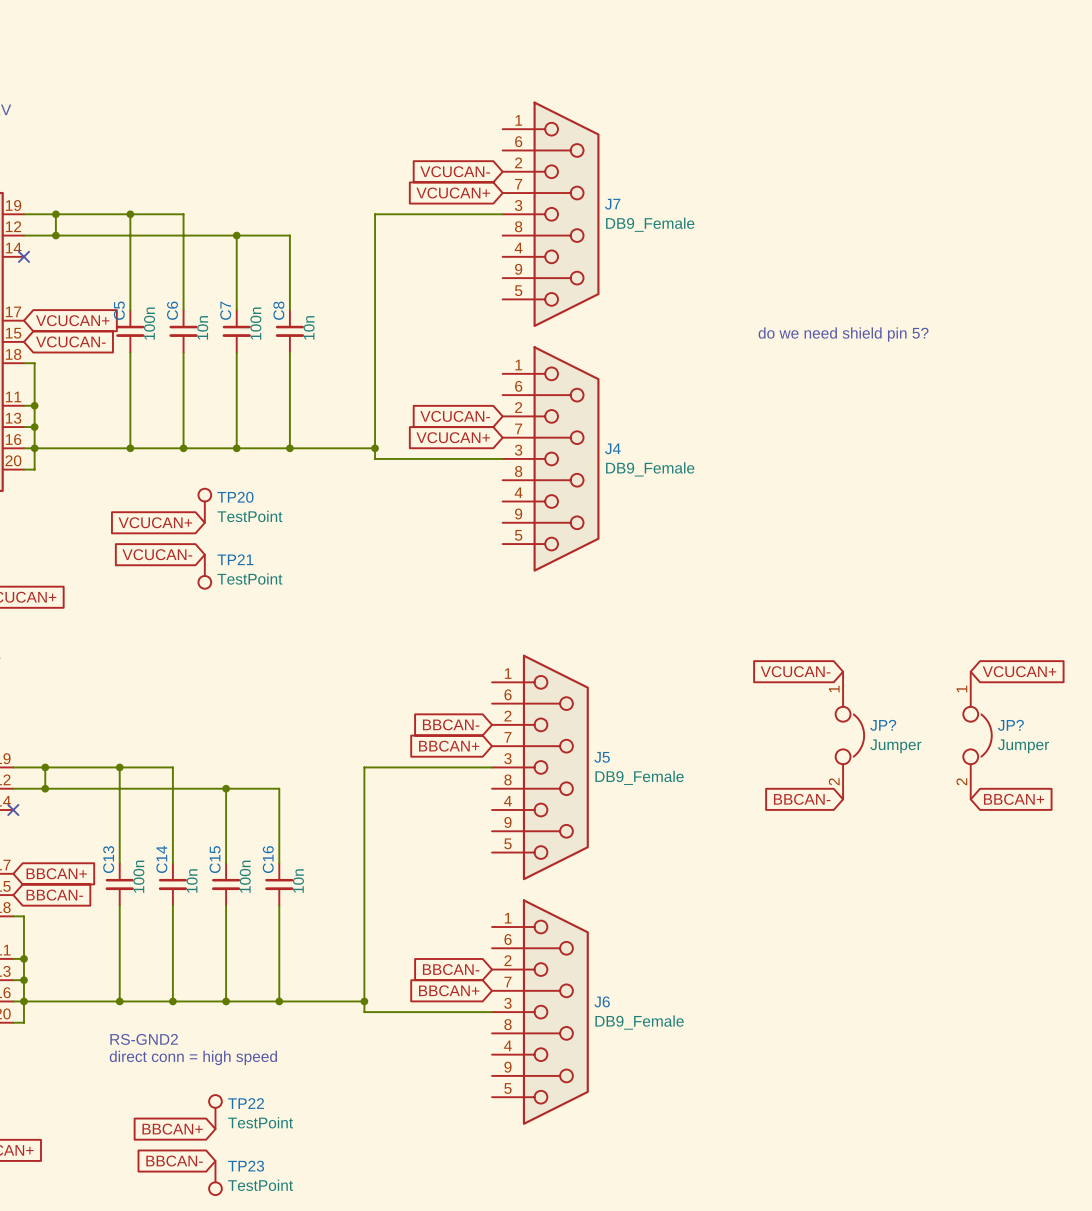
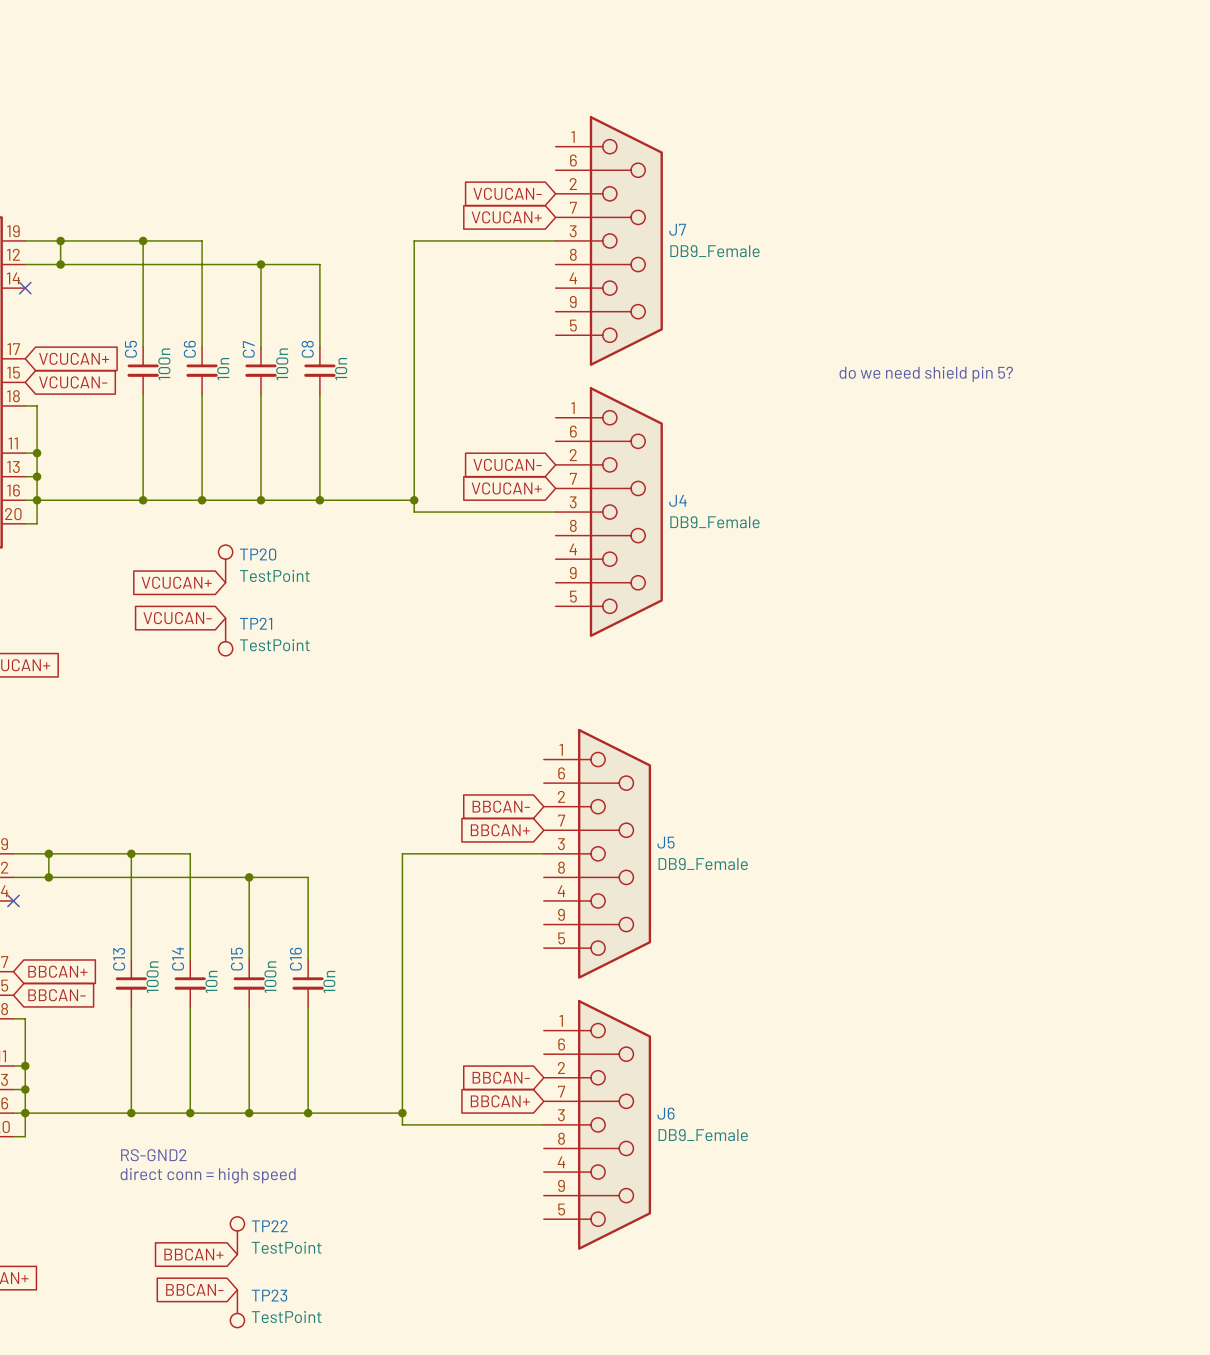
global label: VCUCAN- (795, 671) -> none
global label: VCUCAN+ (1019, 671) -> none
JP?: Jumper (849, 735) -> none
JP?: Jumper (977, 735) -> none
global label: BBCAN- (802, 799) -> none
global label: BBCAN+ (1014, 799) -> none

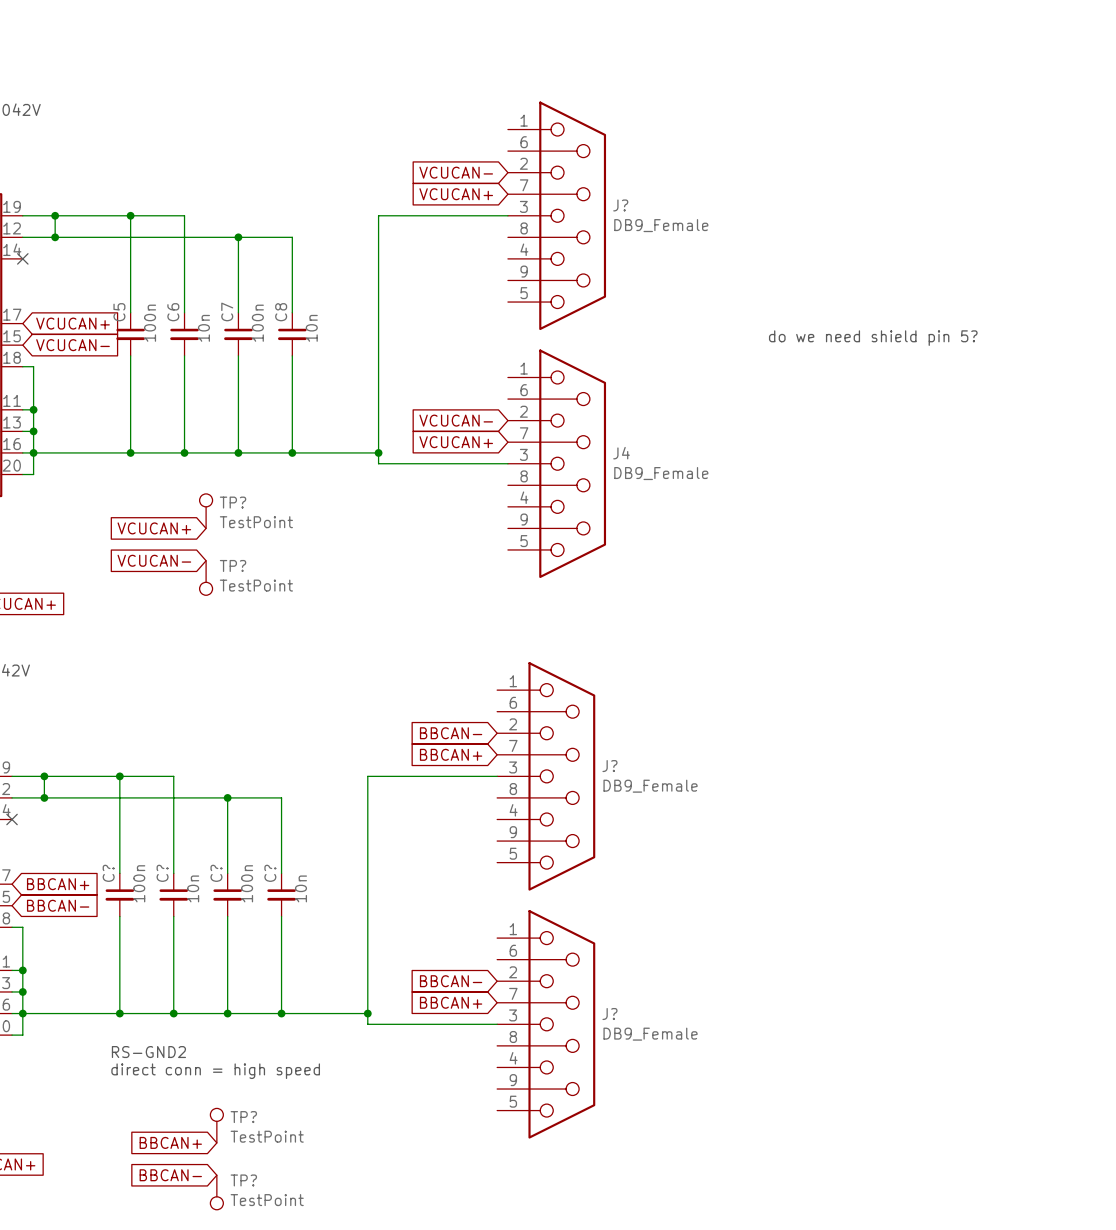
J7 name: J7 (677, 229) -> J? (620, 205)
TP20 name: TP20 (258, 554) -> TP? (233, 502)
TP21 name: TP21 (256, 623) -> TP? (233, 565)
J5 name: J5 (665, 842) -> J? (609, 766)
C14 name: C14 (178, 958) -> C? (162, 873)
C13 name: C13 (119, 959) -> C? (108, 873)
C15 name: C15 (236, 959) -> C? (216, 873)
C16 name: C16 (295, 959) -> C? (270, 873)
J6 name: J6 (666, 1113) -> J? (609, 1014)
TP22 name: TP22 (269, 1226) -> TP? (243, 1117)
TP23 name: TP23 (269, 1295) -> TP? (243, 1180)

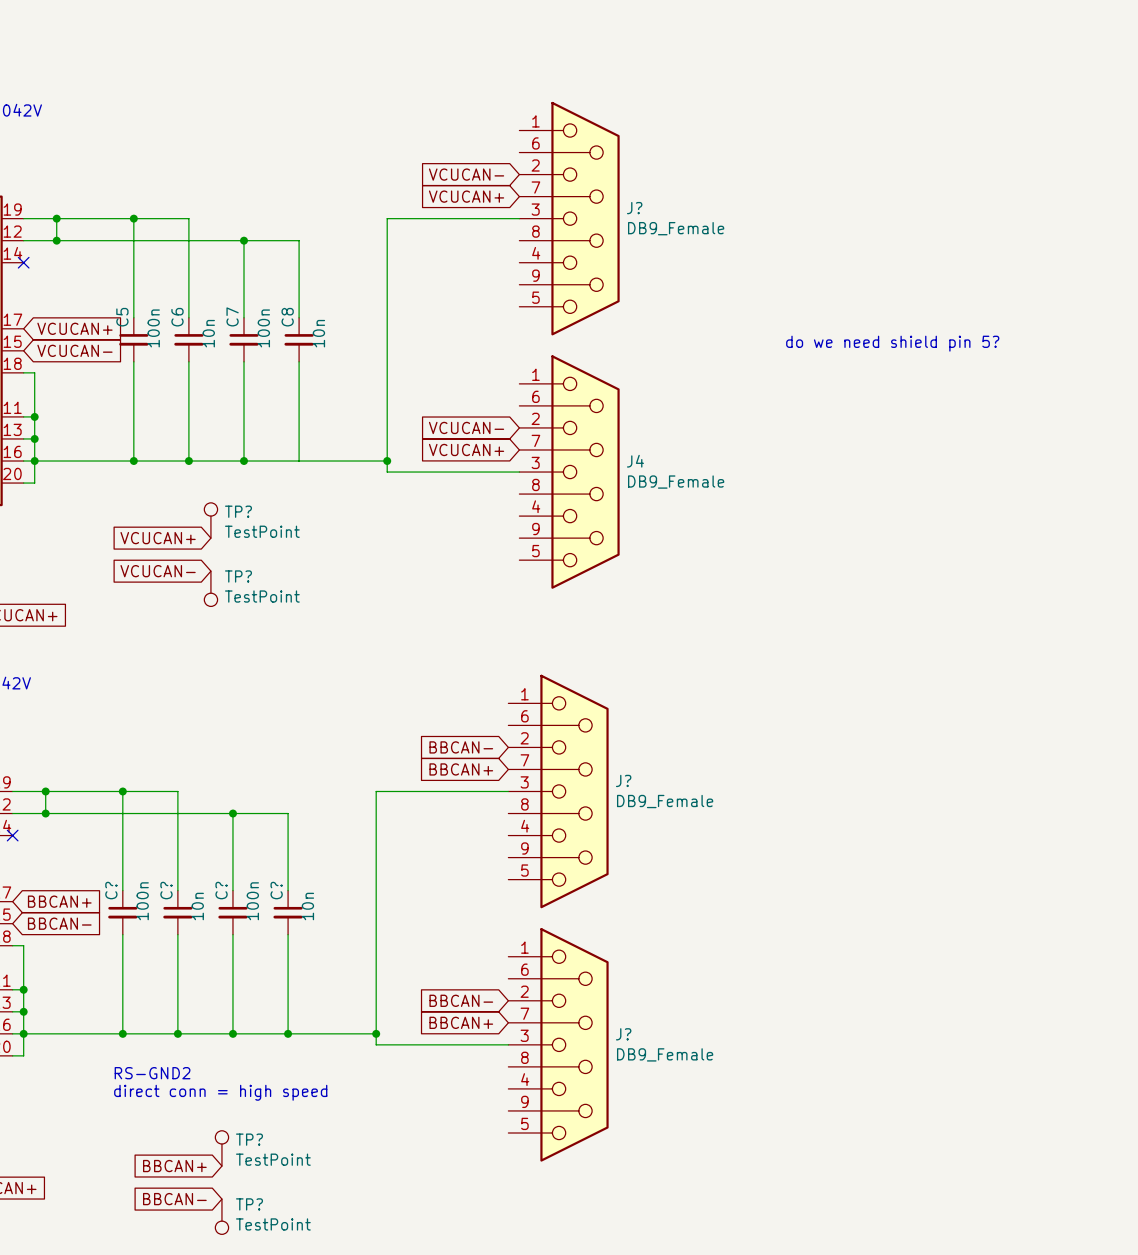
junction: (292, 452) -> none

